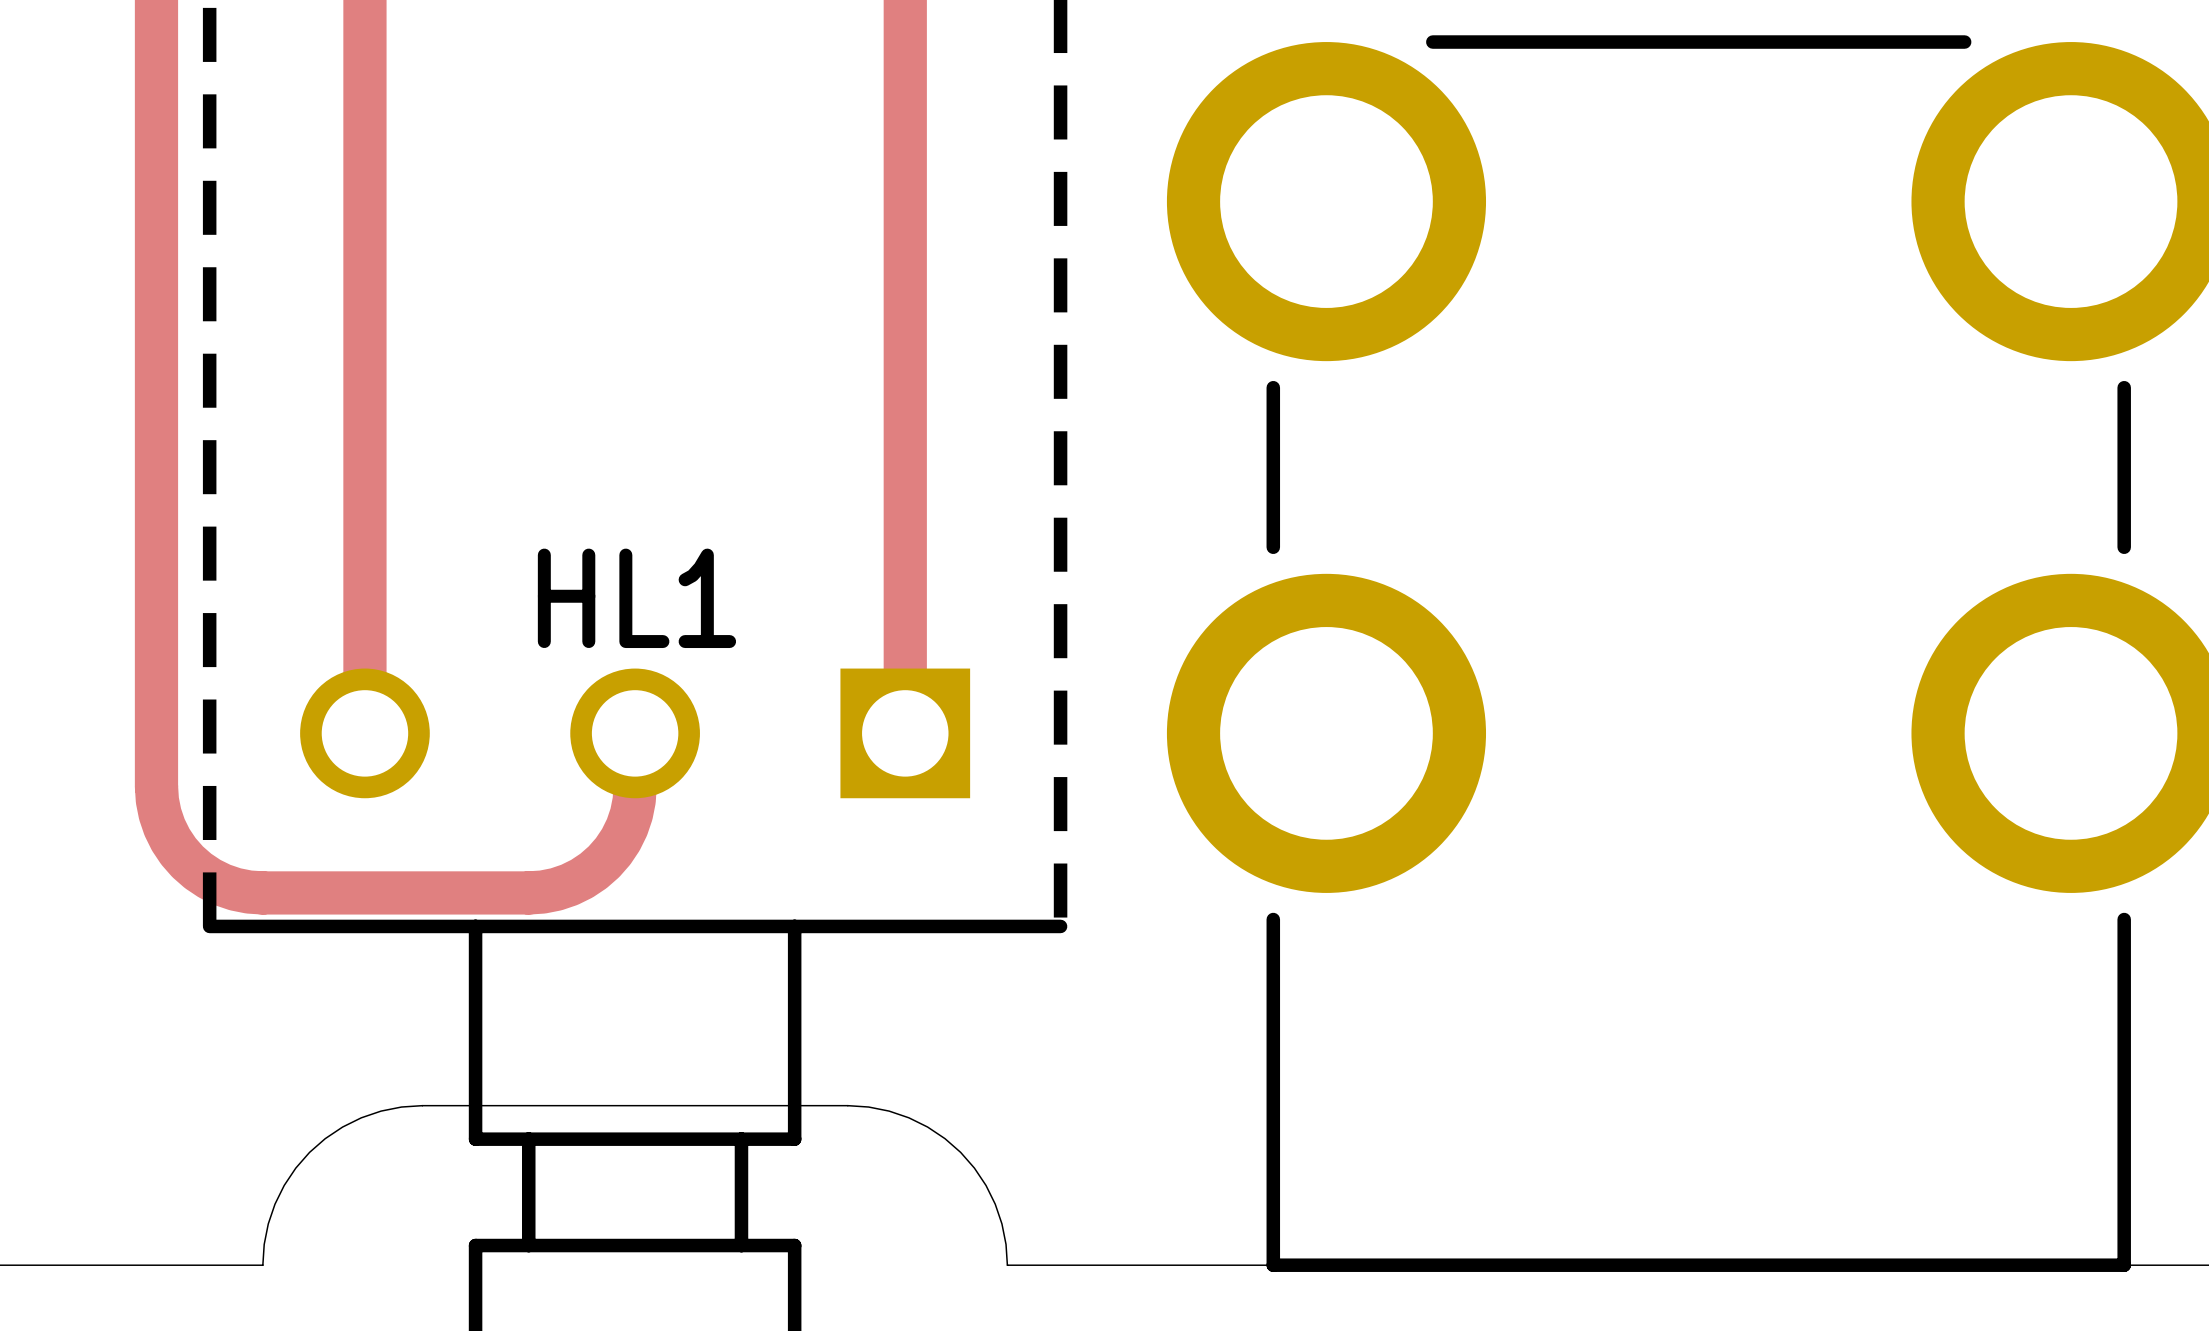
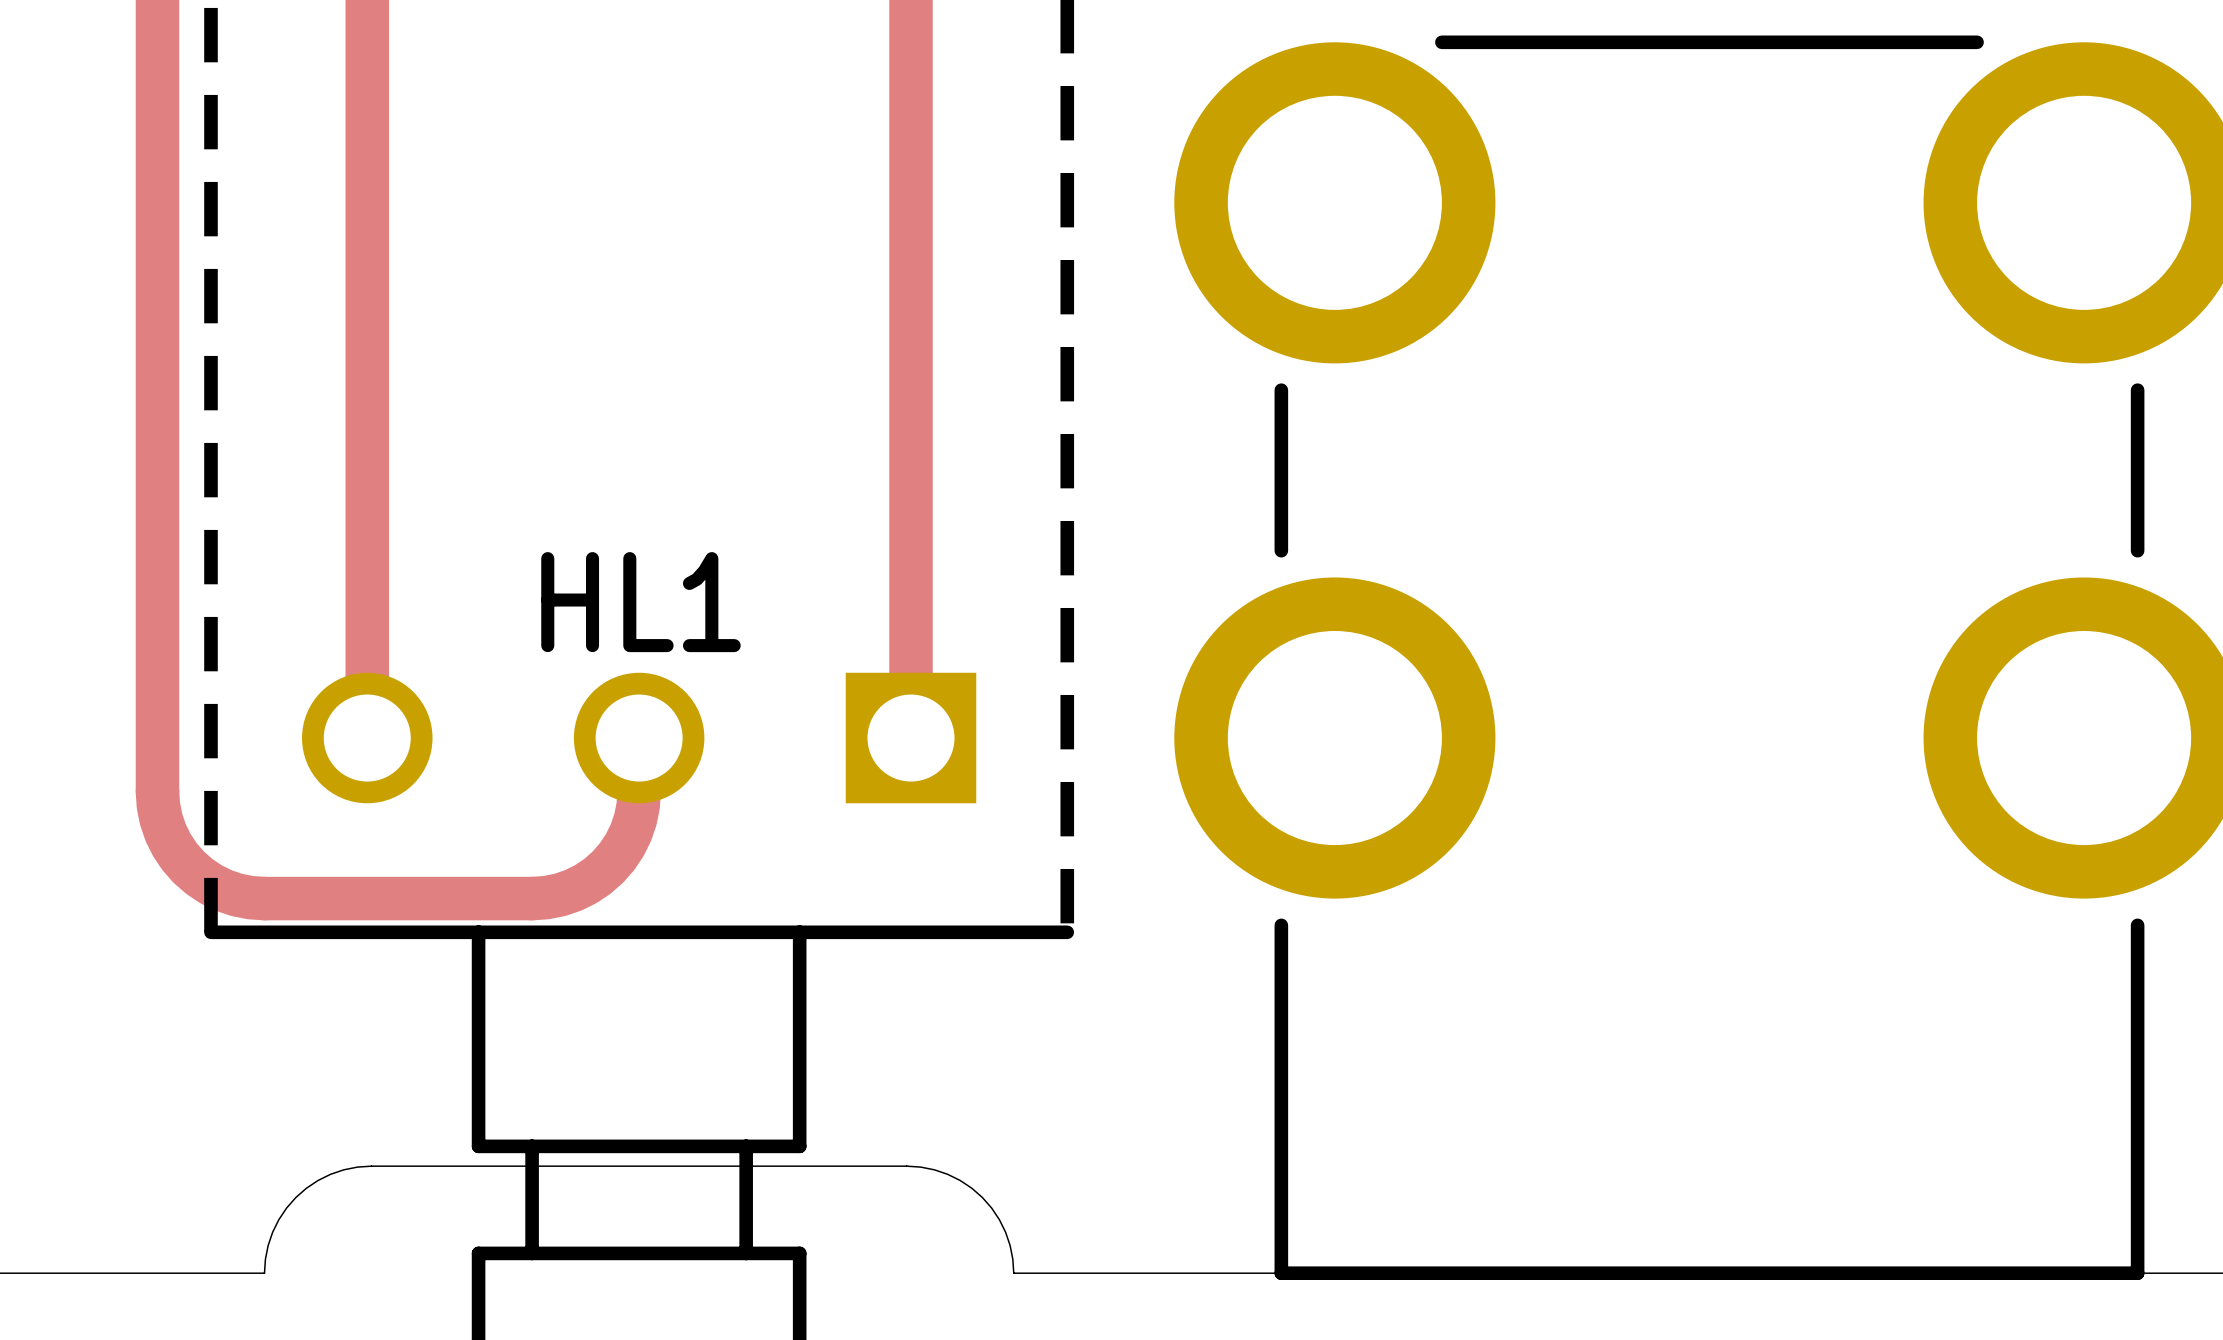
board edge: (262, 1265) (264, 1244) (274, 1204) (284, 1185) (309, 1152) (342, 1127) (361, 1117) (401, 1107) (422, 1105) (847, 1105) (889, 1111) (927, 1127) (960, 1152) (974, 1168) (986, 1185) (1001, 1223) (1007, 1265) -> (264, 1273) (268, 1245) (272, 1232) (286, 1208) (295, 1197) (306, 1188) (330, 1174) (343, 1169) (371, 1166) (920, 1167) (947, 1174) (960, 1180) (971, 1188) (991, 1208) (1005, 1232) (1010, 1245) (1013, 1273)

